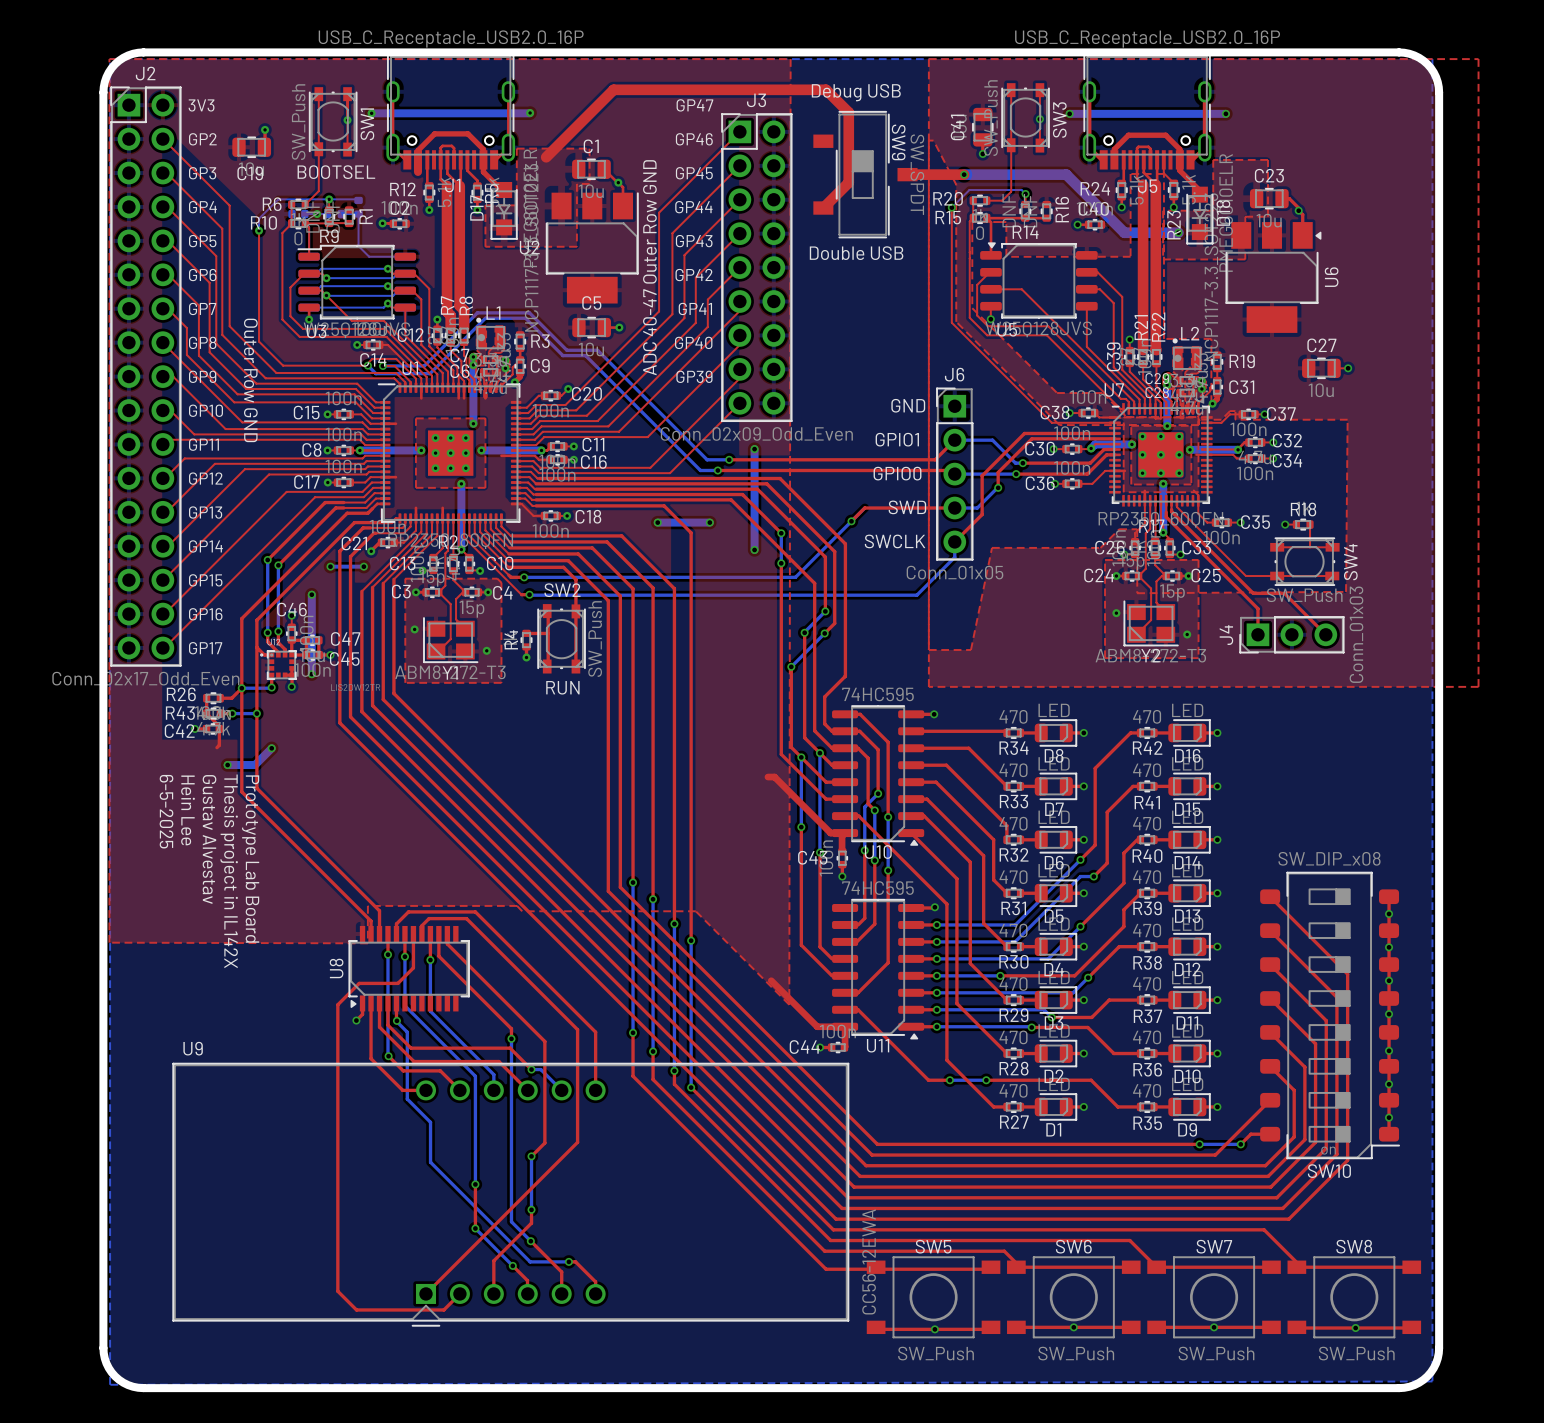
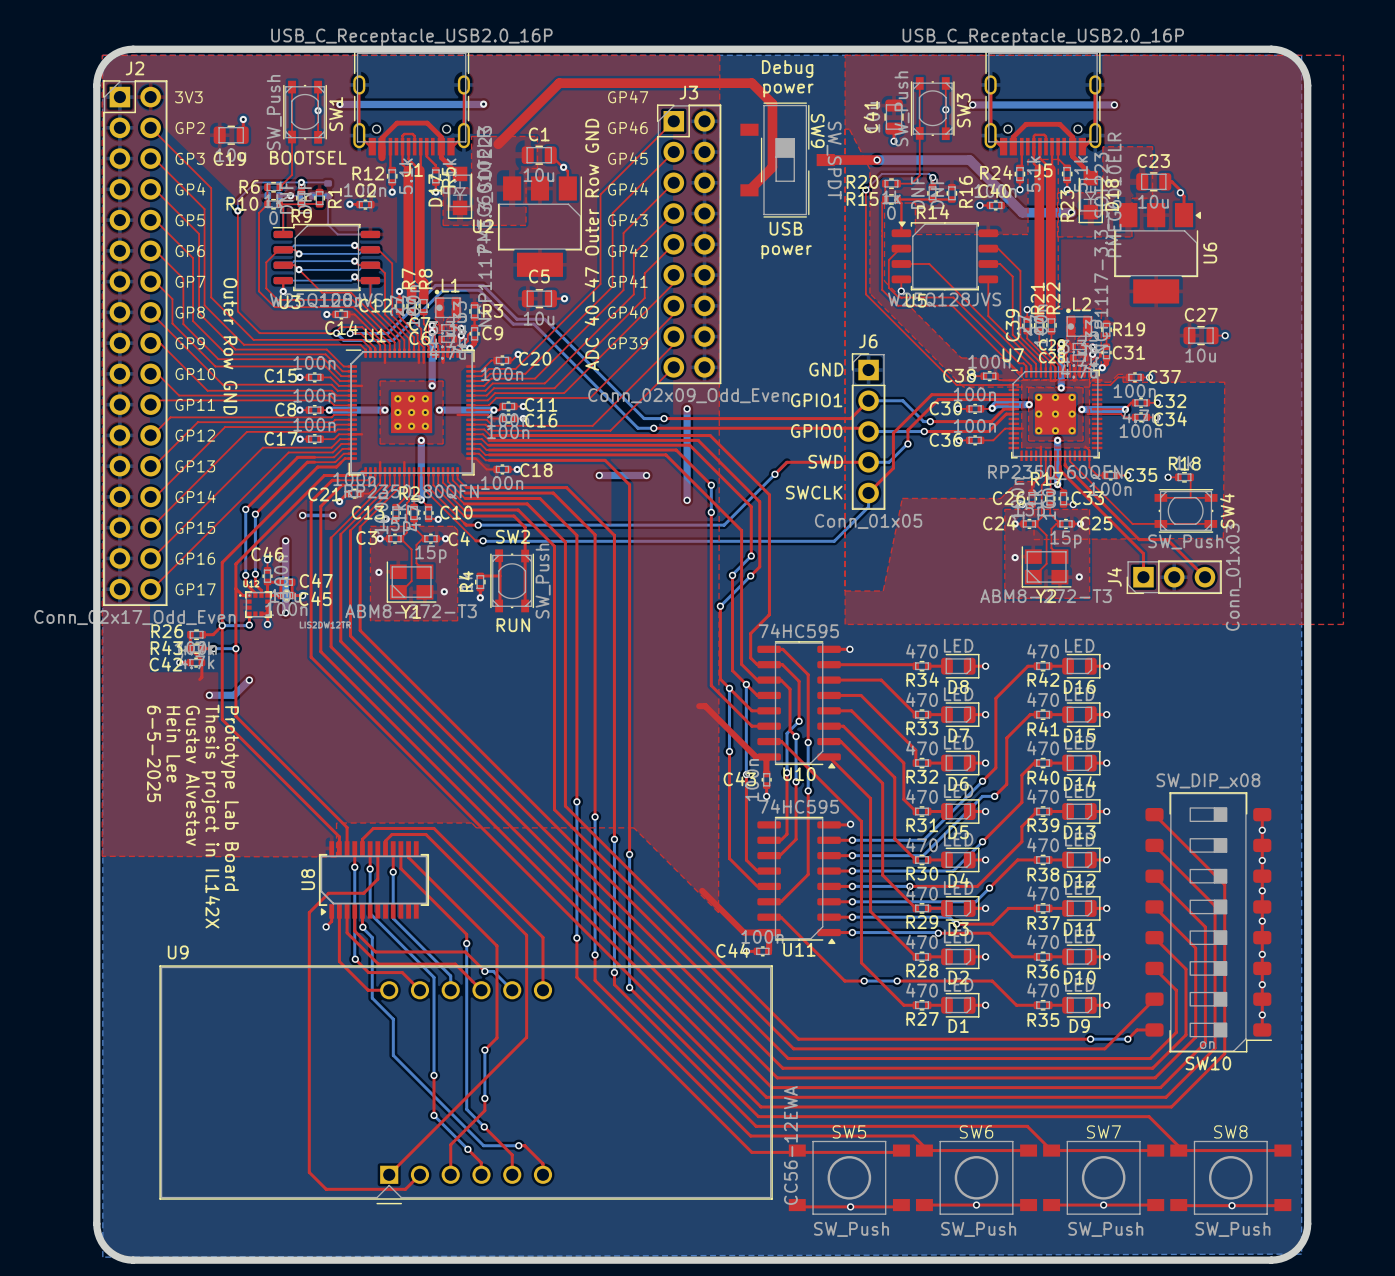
text: Debug USB (856, 92) -> Debug (787, 69)
text: none -> power (788, 90)
text: none -> USB (786, 228)
text: Double USB (856, 253) -> none
text: none -> power (786, 252)

